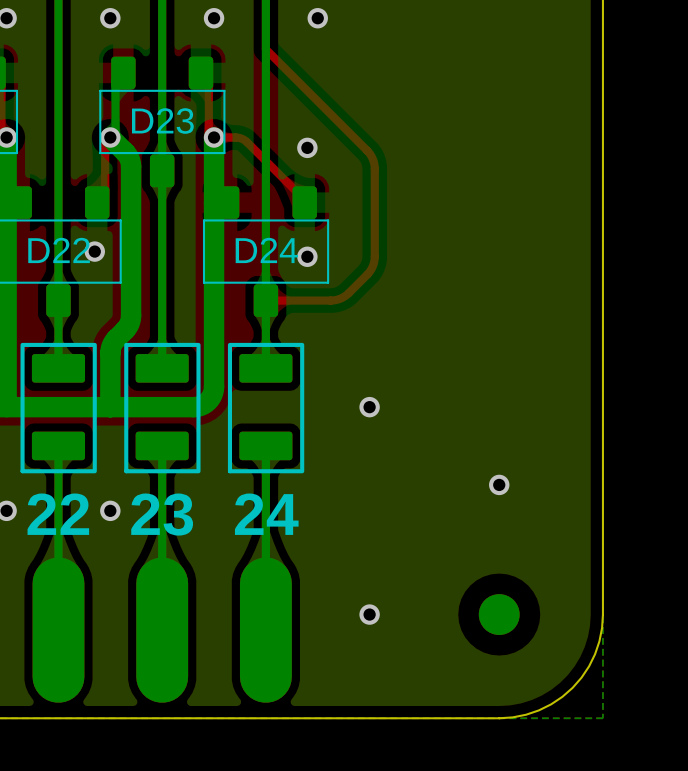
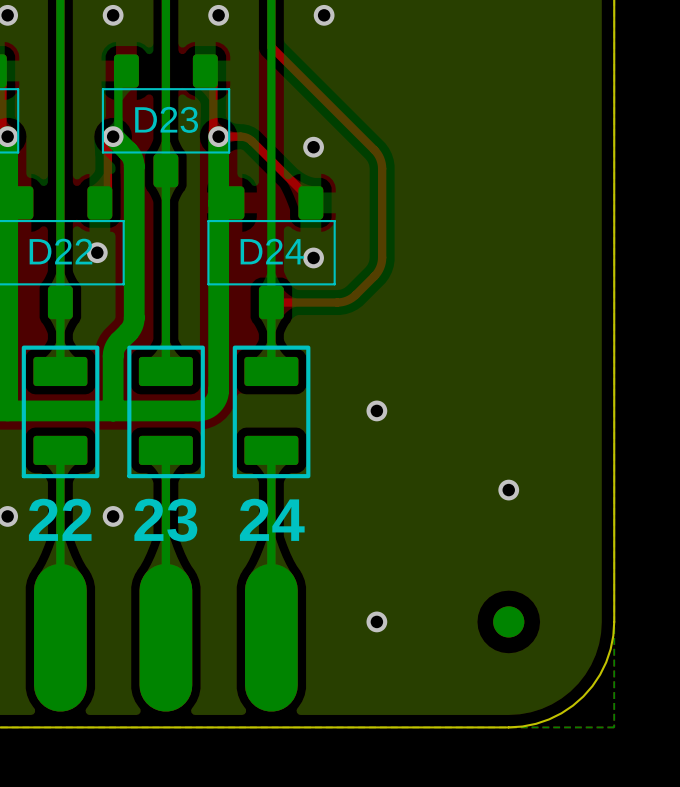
part: (499, 614) -> none
part: none -> (508, 621)

